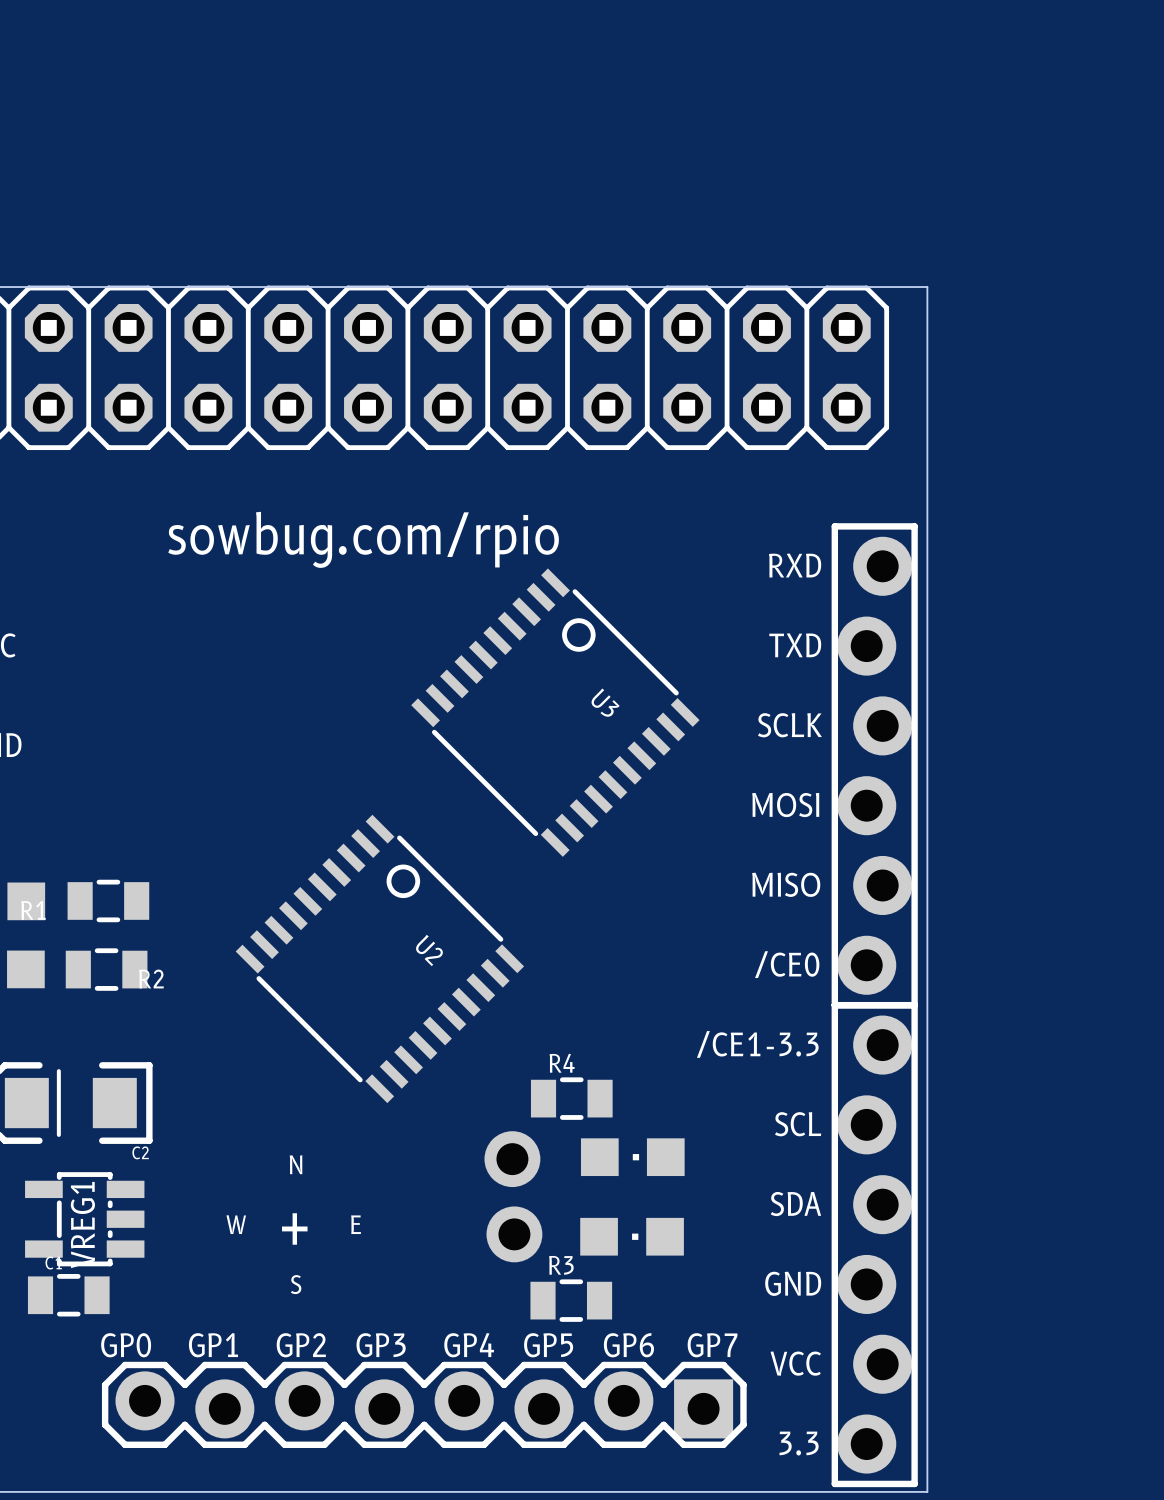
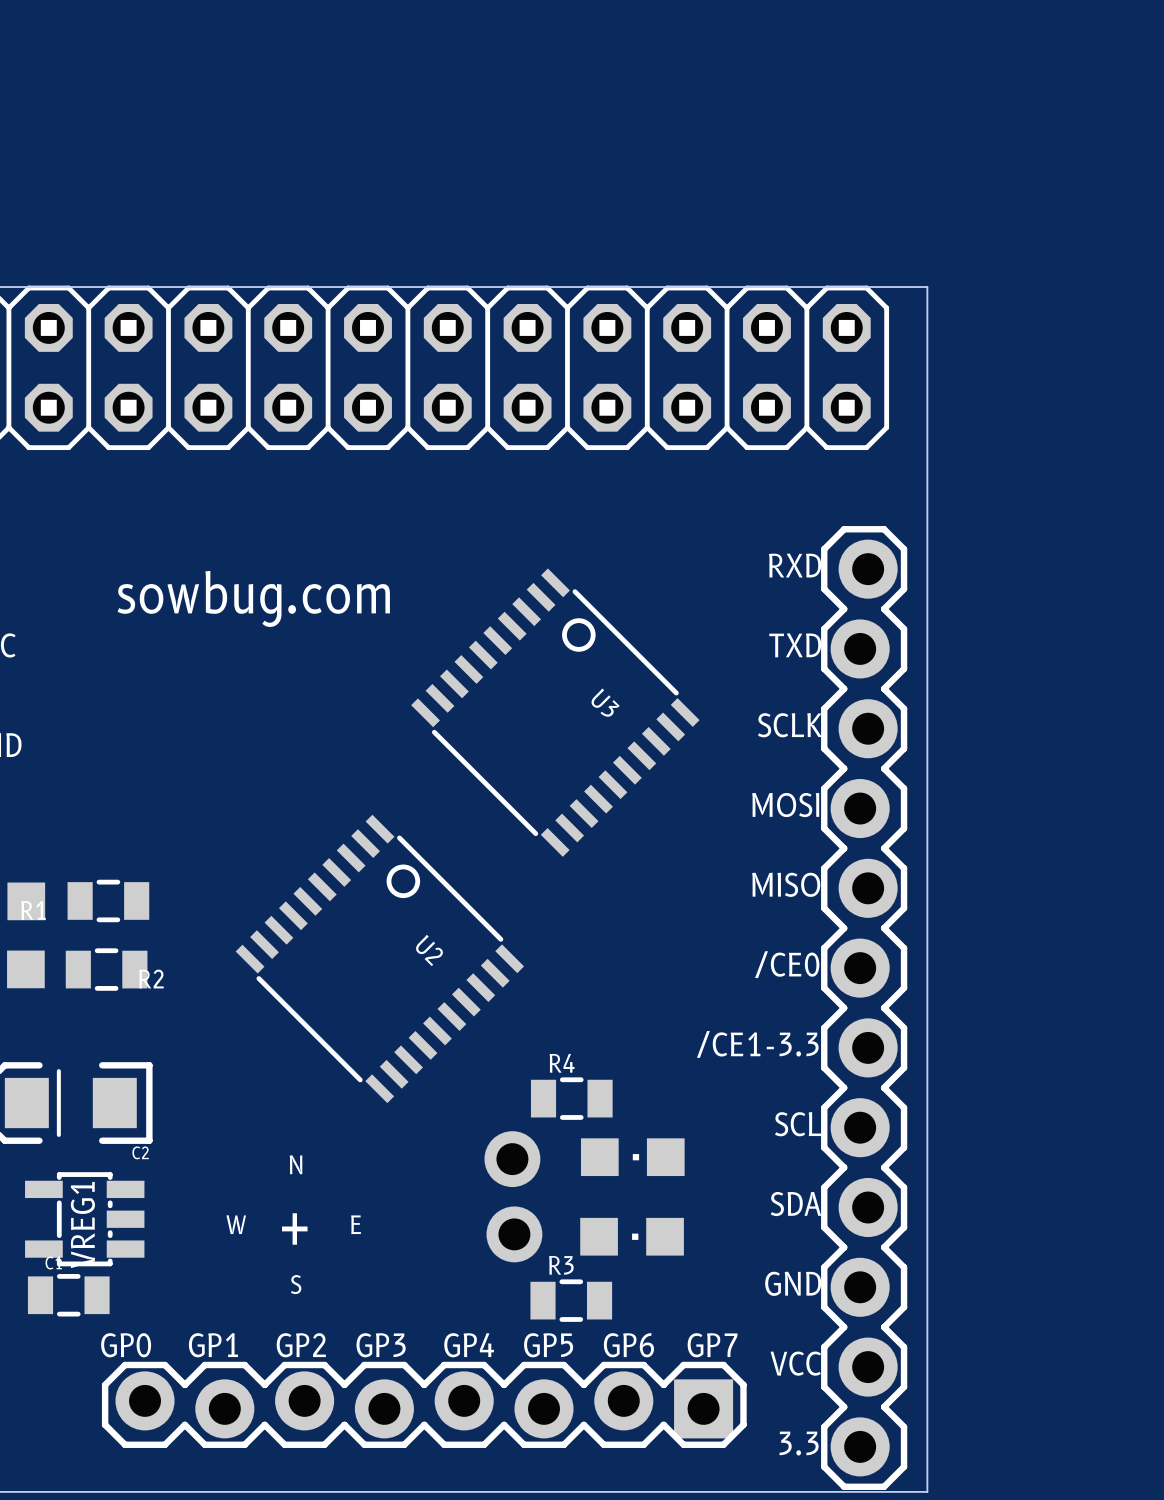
text: sowbug.com/rpio (363, 539) -> sowbug.com (253, 598)
part: (874, 765) -> none
part: none -> (864, 1008)
part: (874, 1244) -> none

